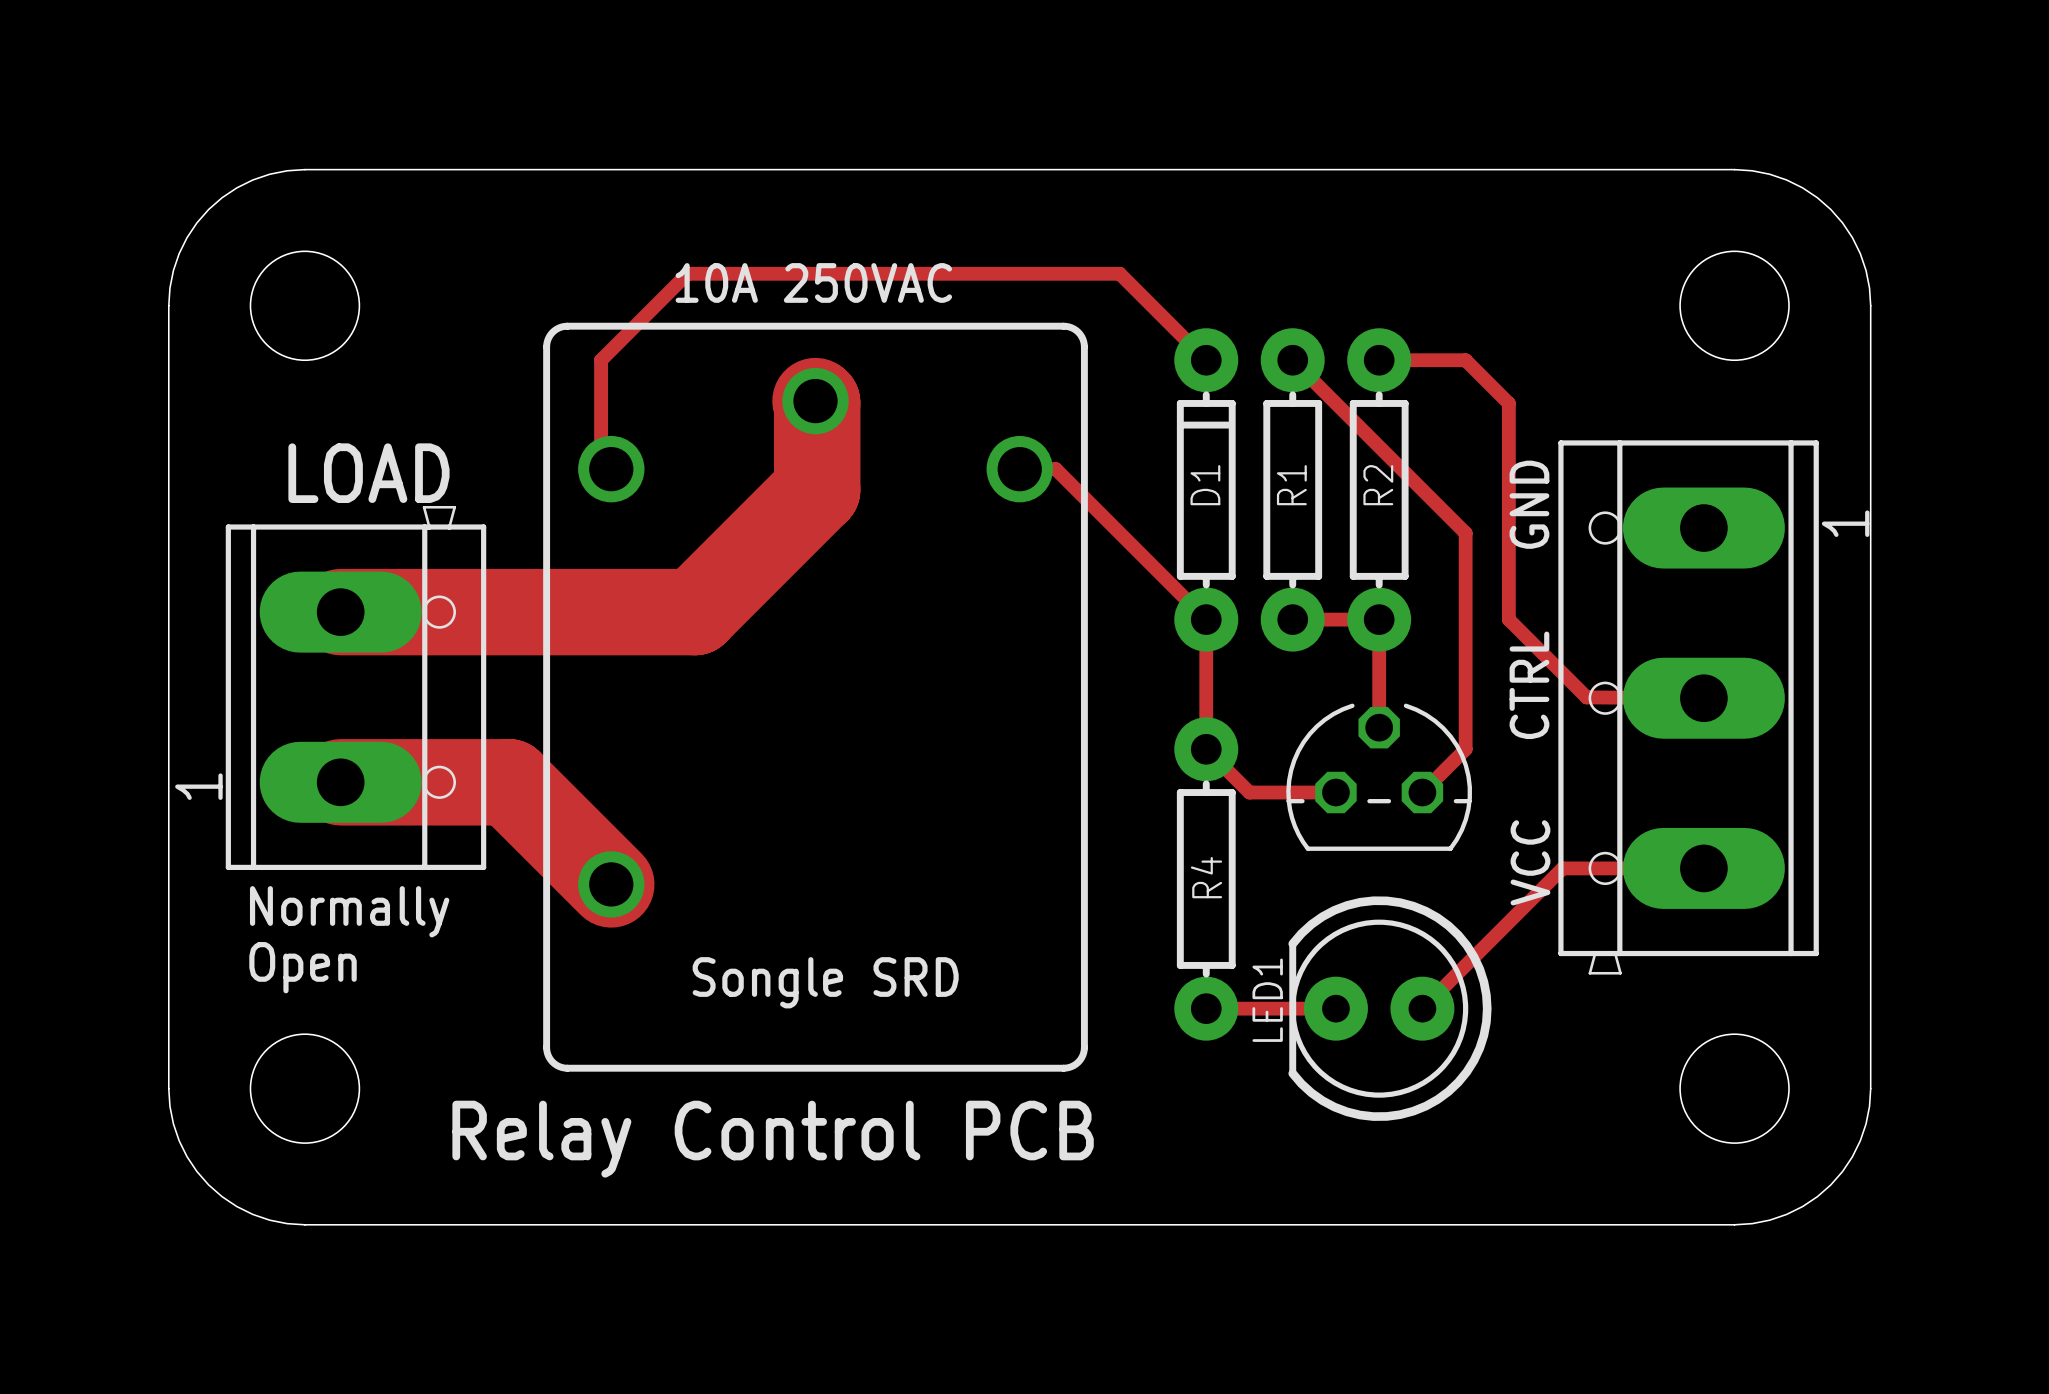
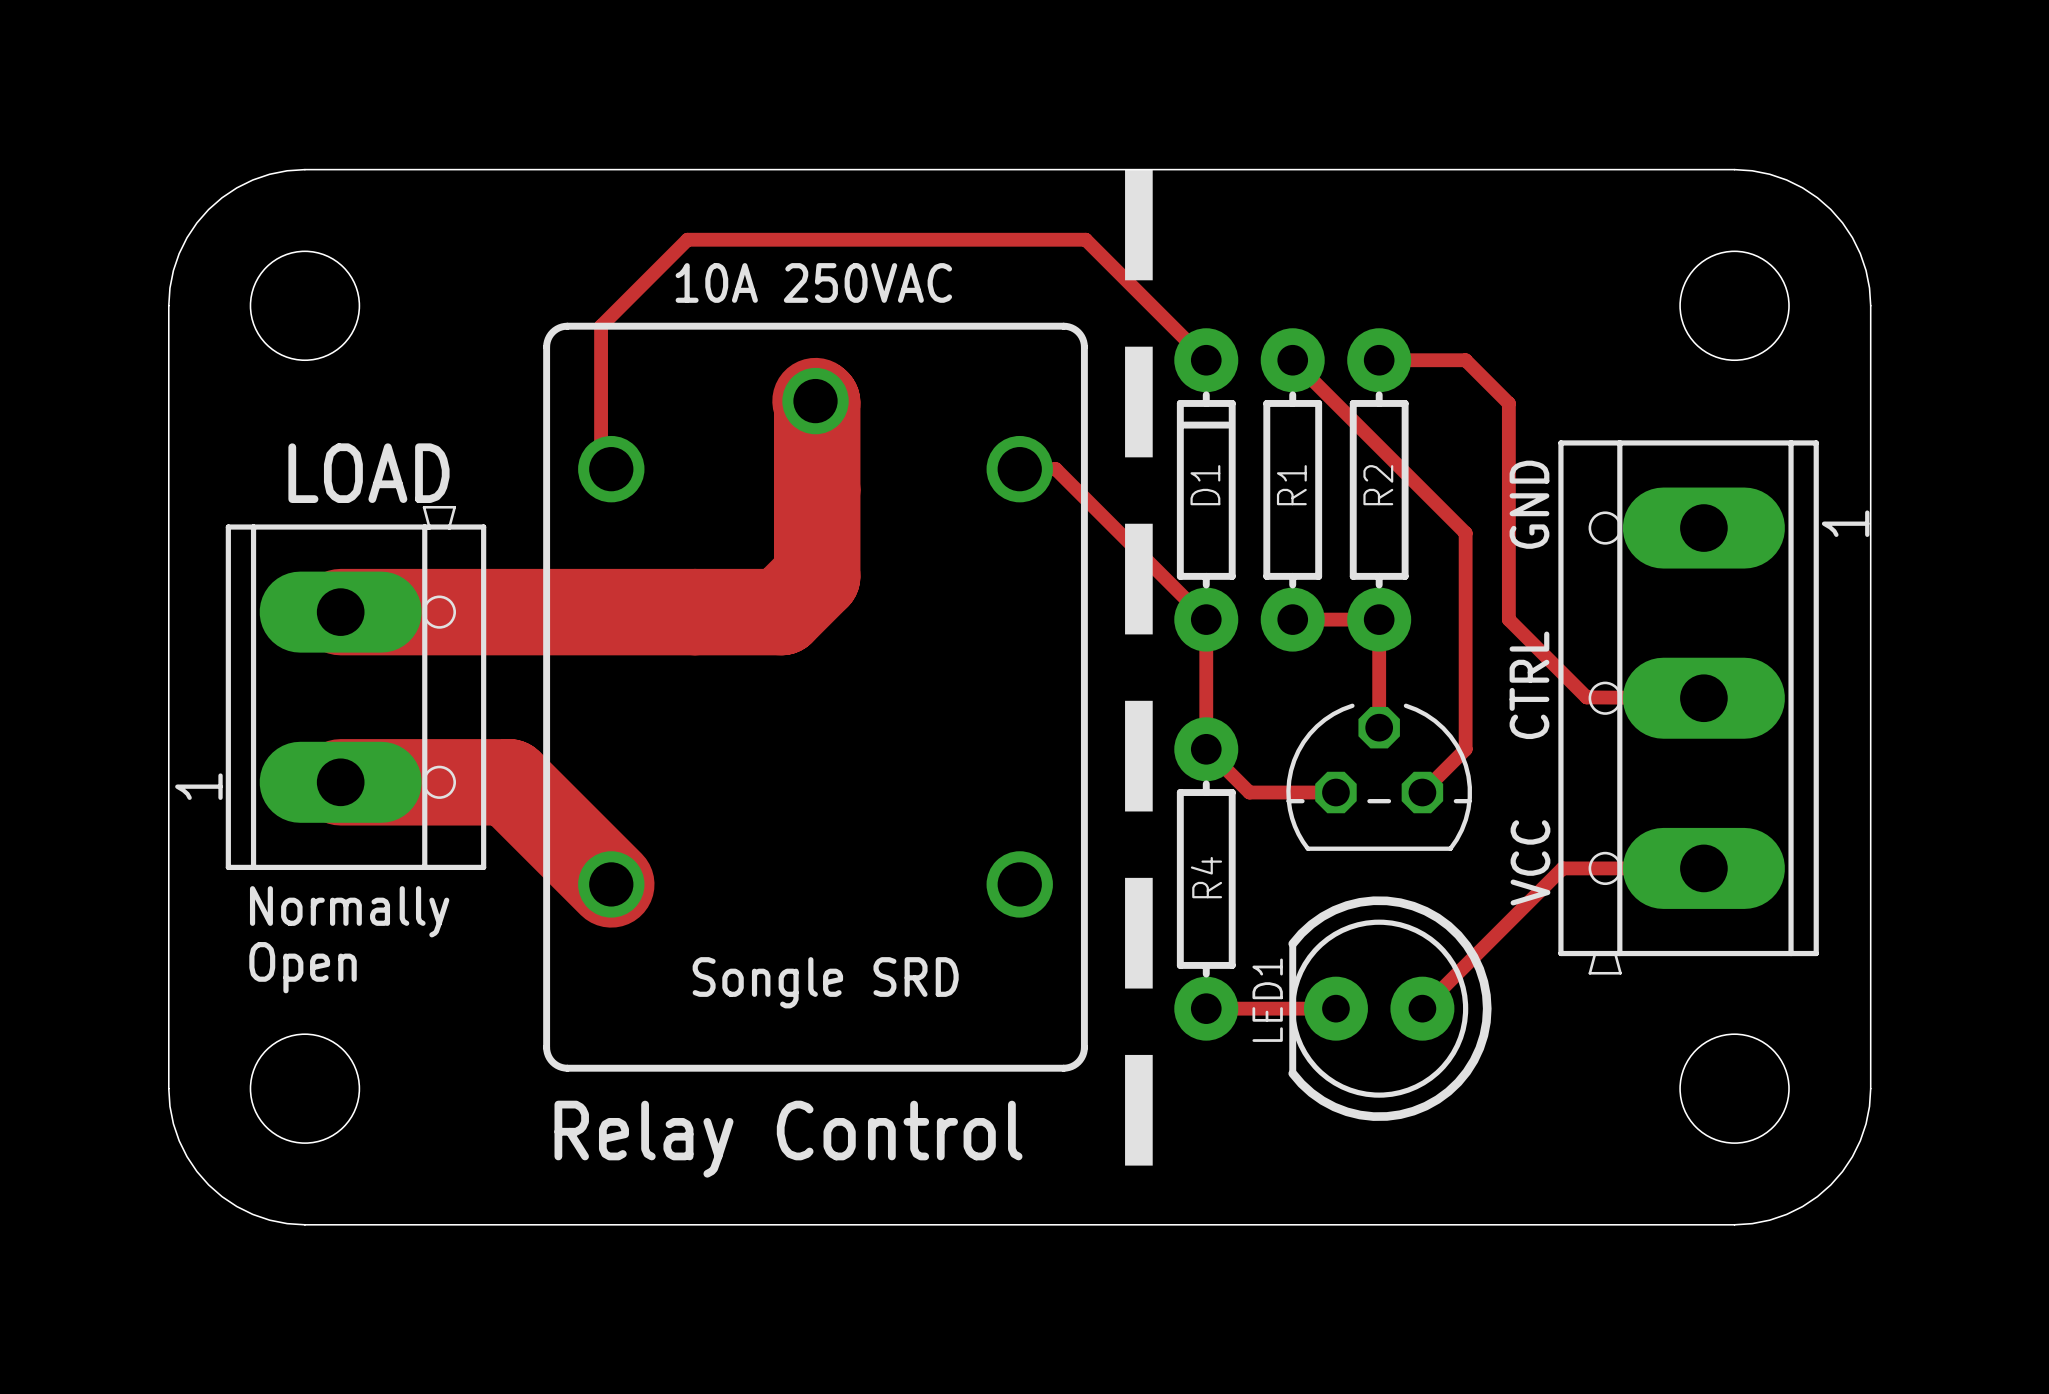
line: none -> (1138, 169) (1138, 1224)
track: (1119, 273) (687, 273) (601, 360) -> (1119, 273) (1085, 239) (687, 239) (601, 326) (601, 360)
part footprint: [543, 322, 1088, 1072] -> [543, 322, 1088, 1072]
track: (817, 489) (695, 612) -> (817, 489) (817, 576) (781, 612) (695, 612)
text: Relay Control PCB (773, 1139) -> Relay Control (788, 1139)

